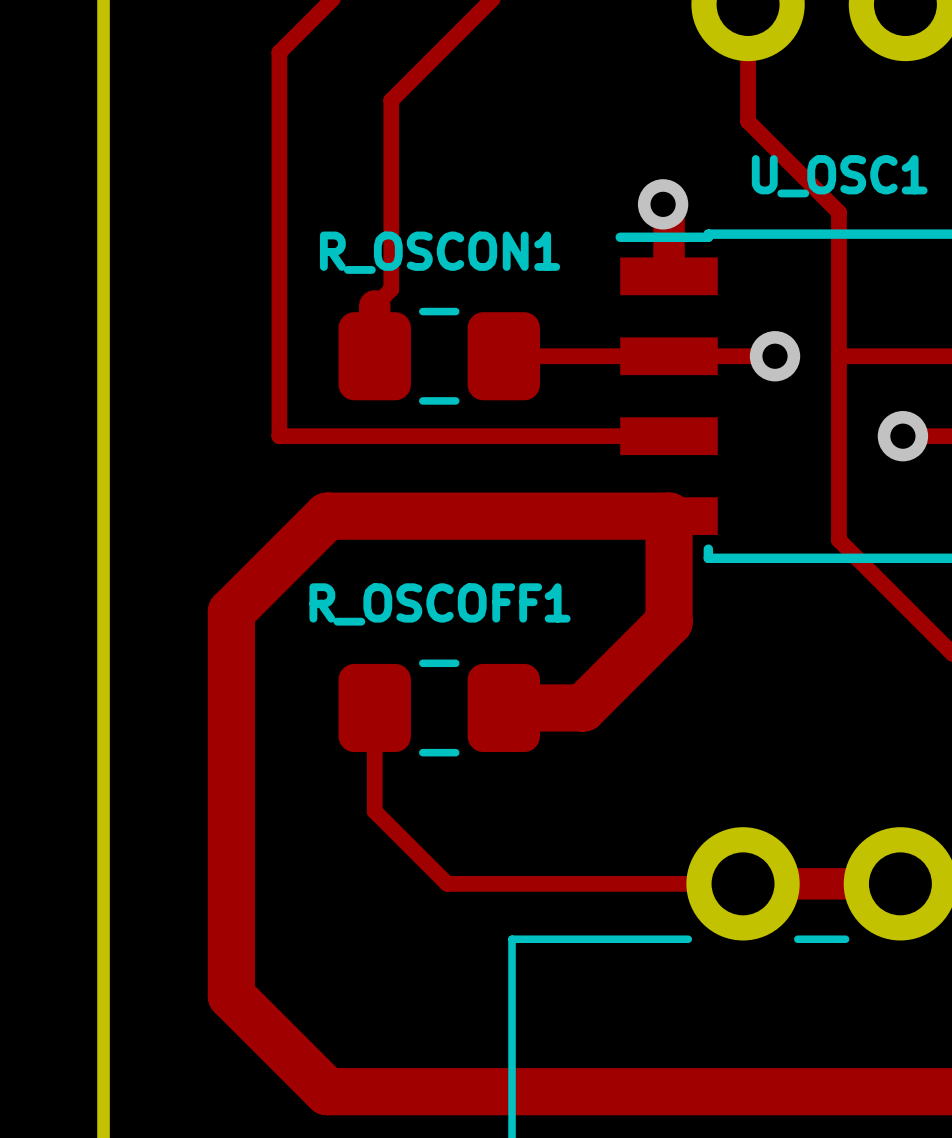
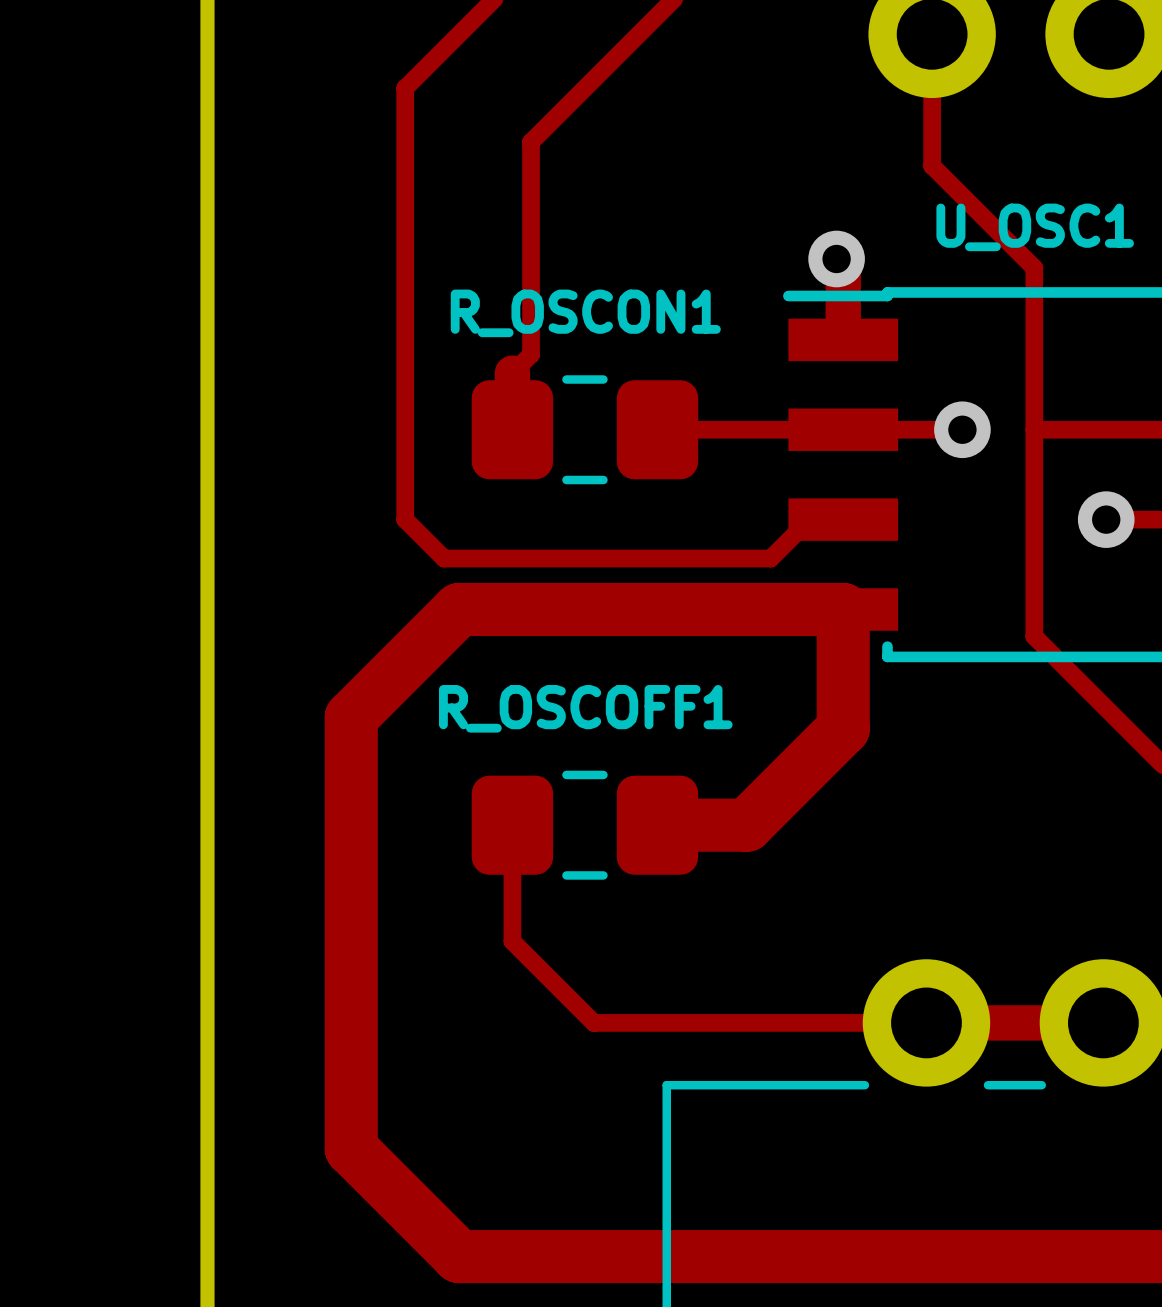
track: (279, 436) (639, 436) -> (405, 519) (444, 558) (770, 558) (809, 519)

